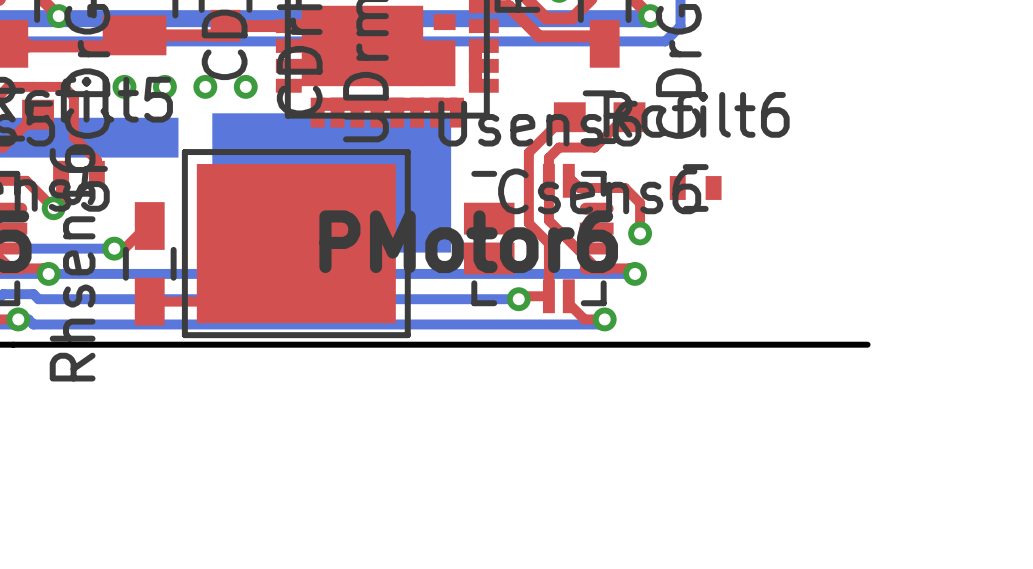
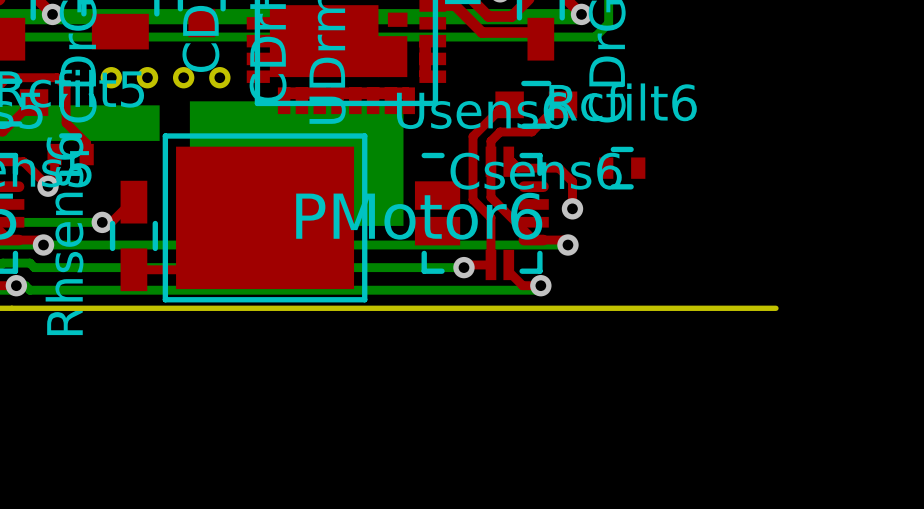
top track: (225, 25) (215, 35) (134, 35) (123, 46) (28, 46) (25, 43) (13, 43) -> none
top track: (225, 26) (288, 26) -> none

